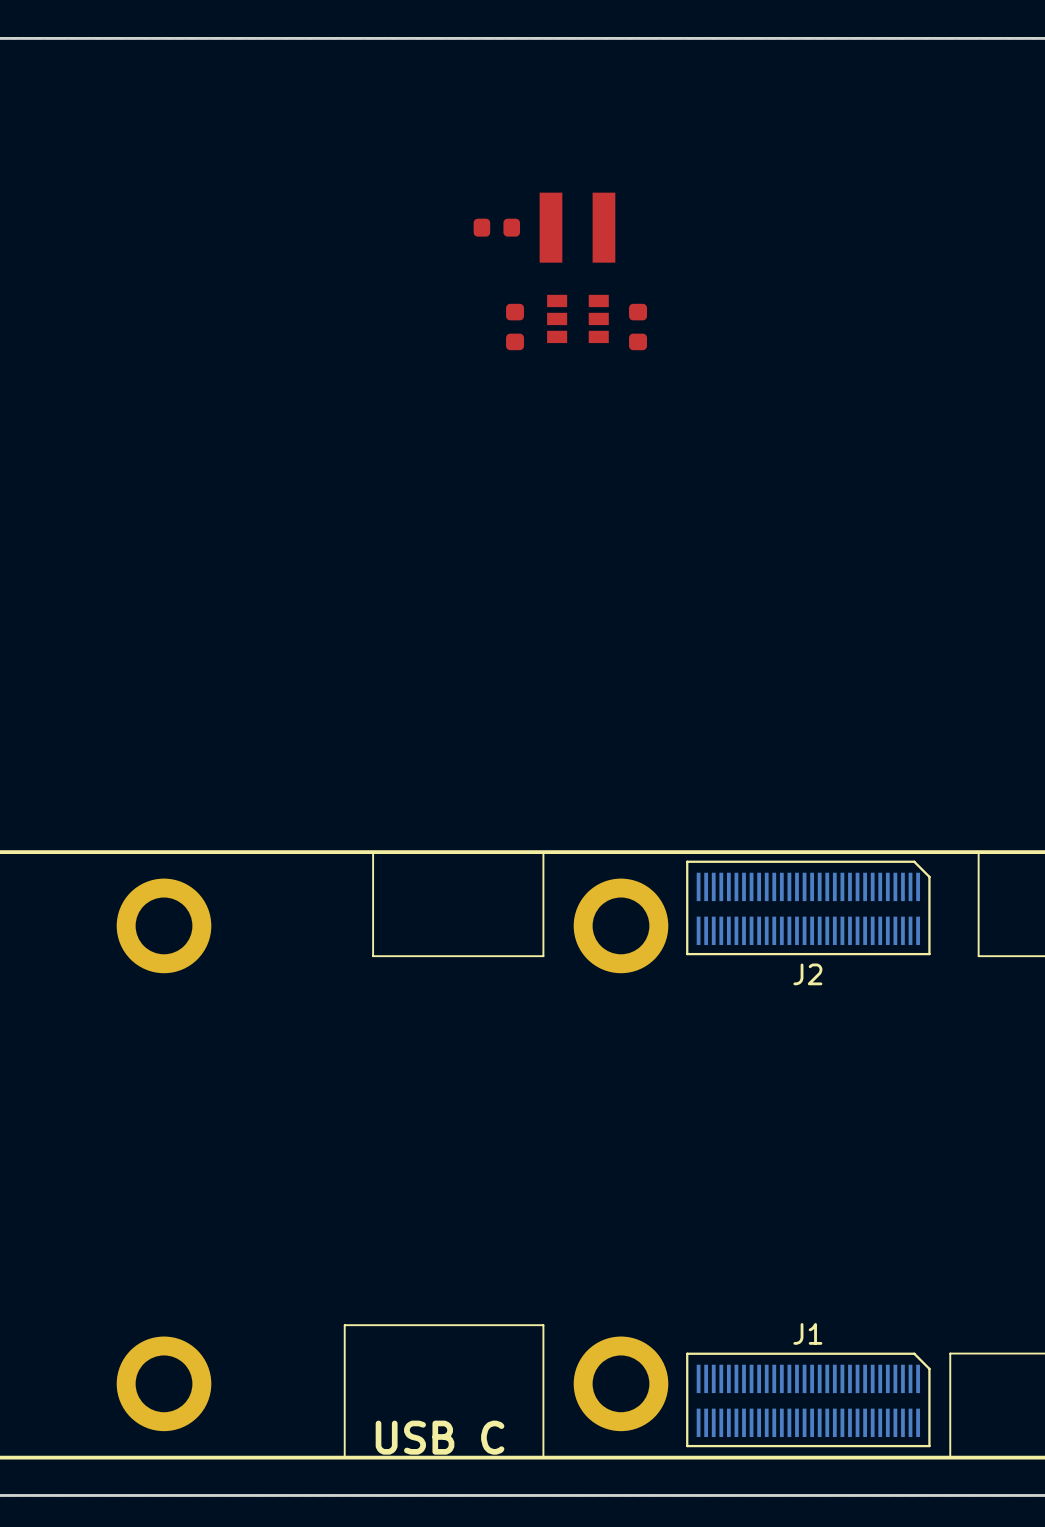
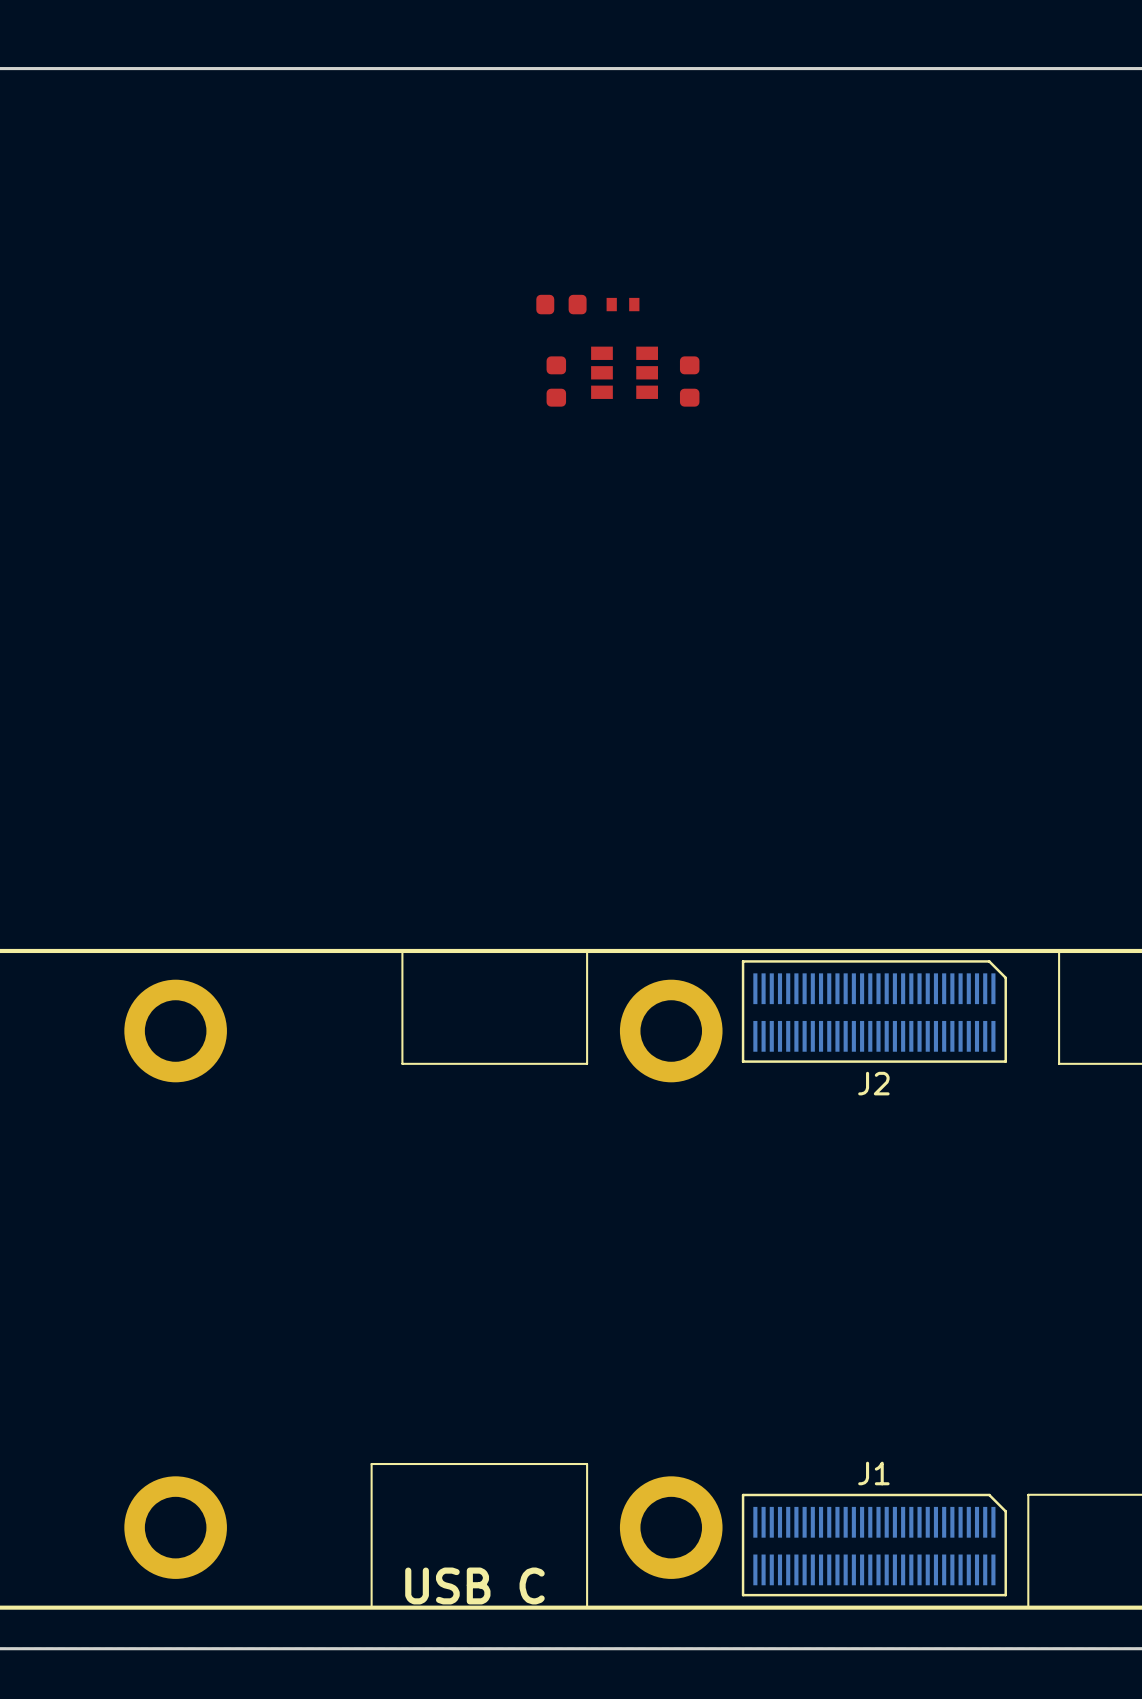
part position: (496, 227) -> (561, 304)
part: (577, 227) -> none
part: none -> (623, 304)

